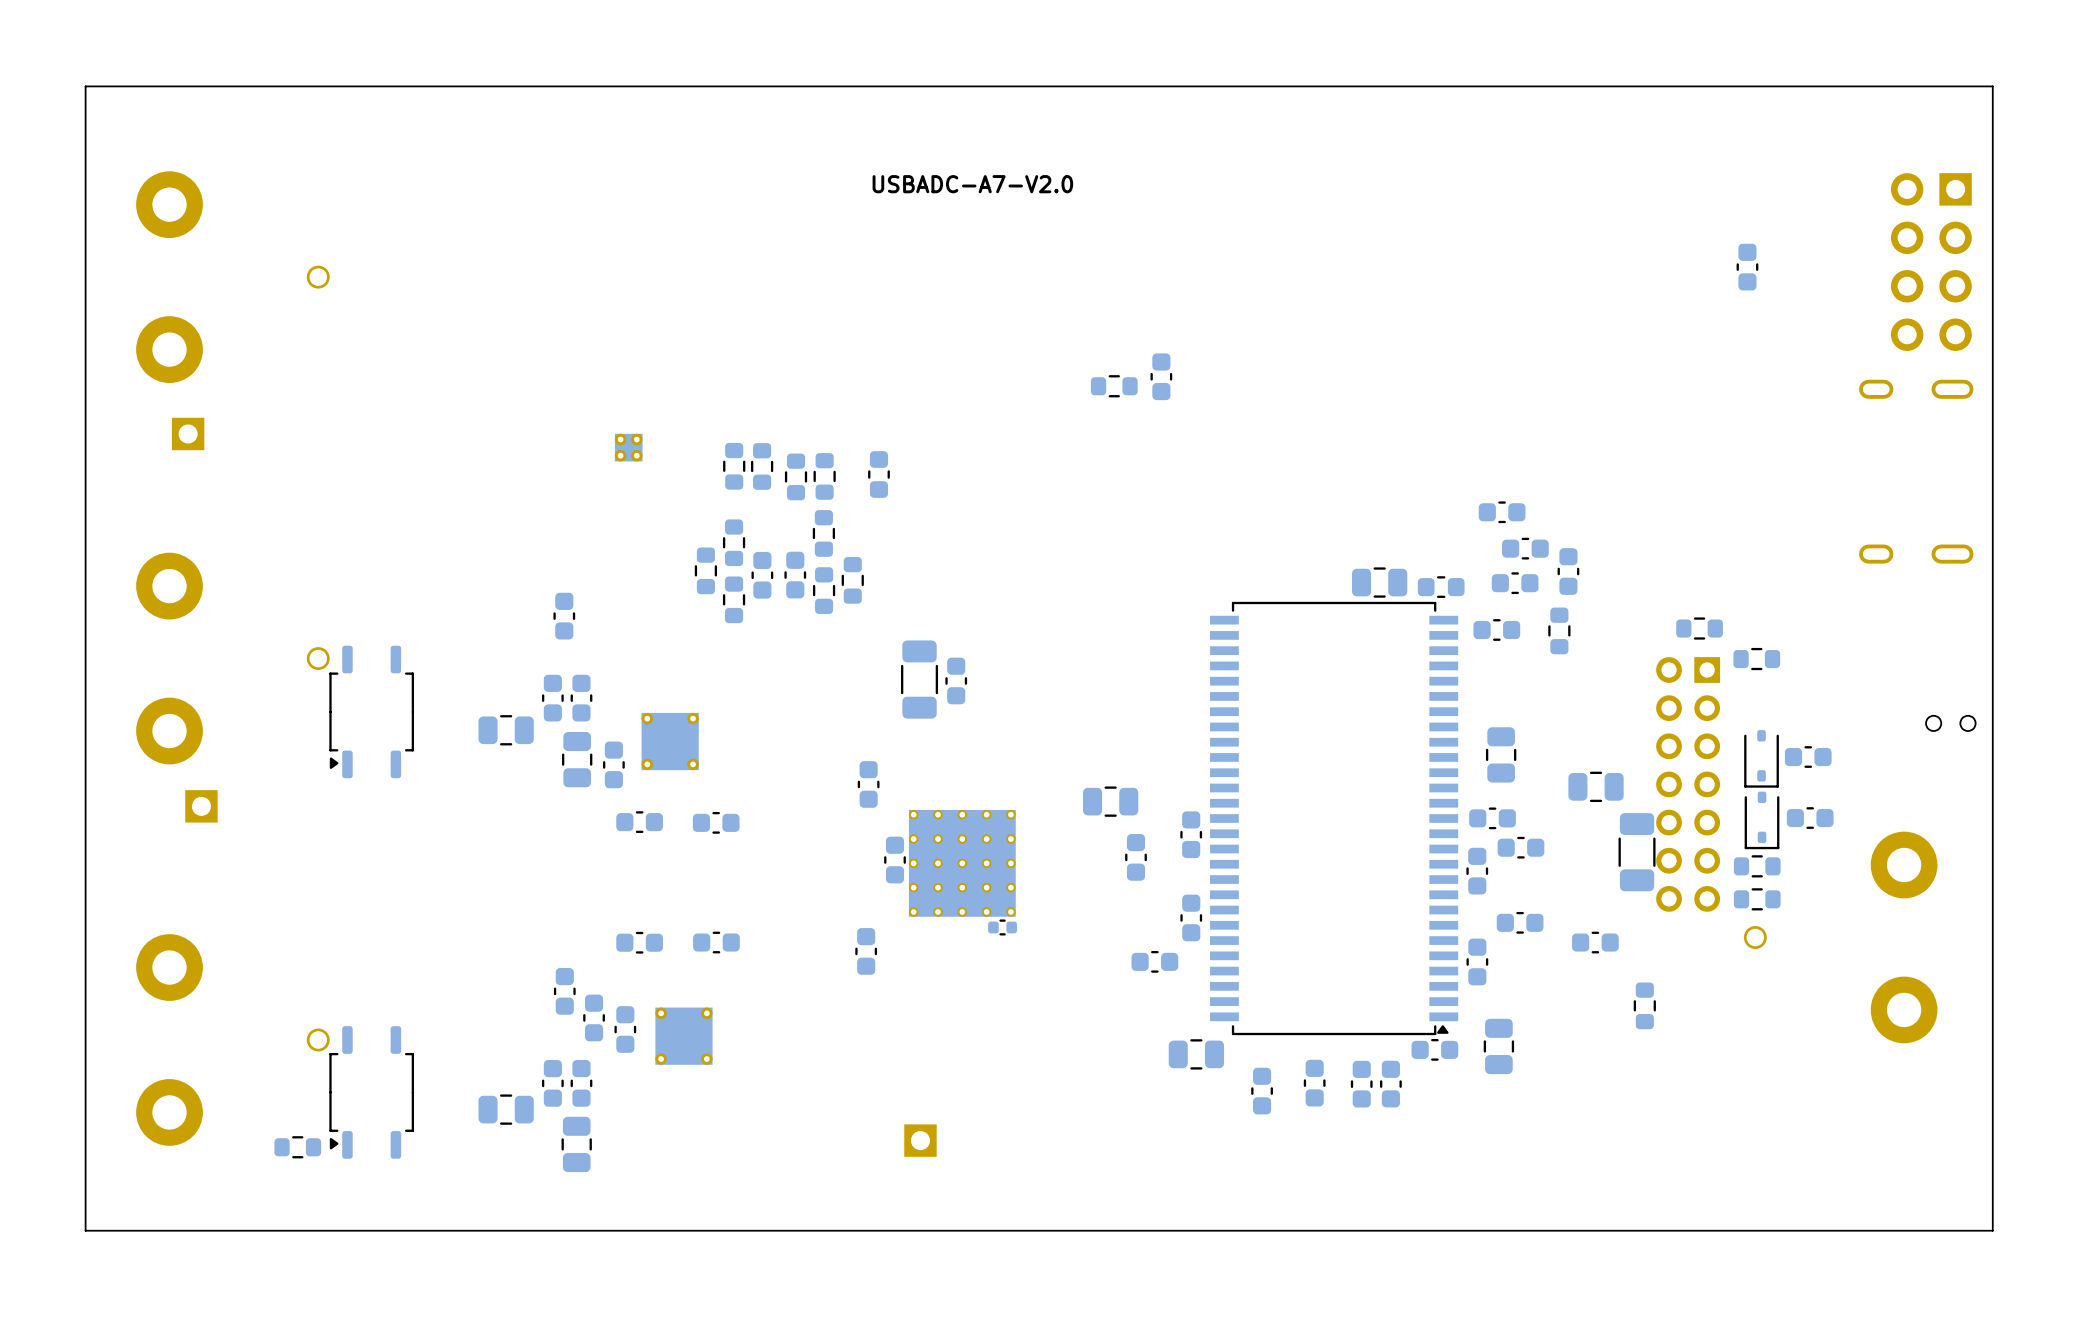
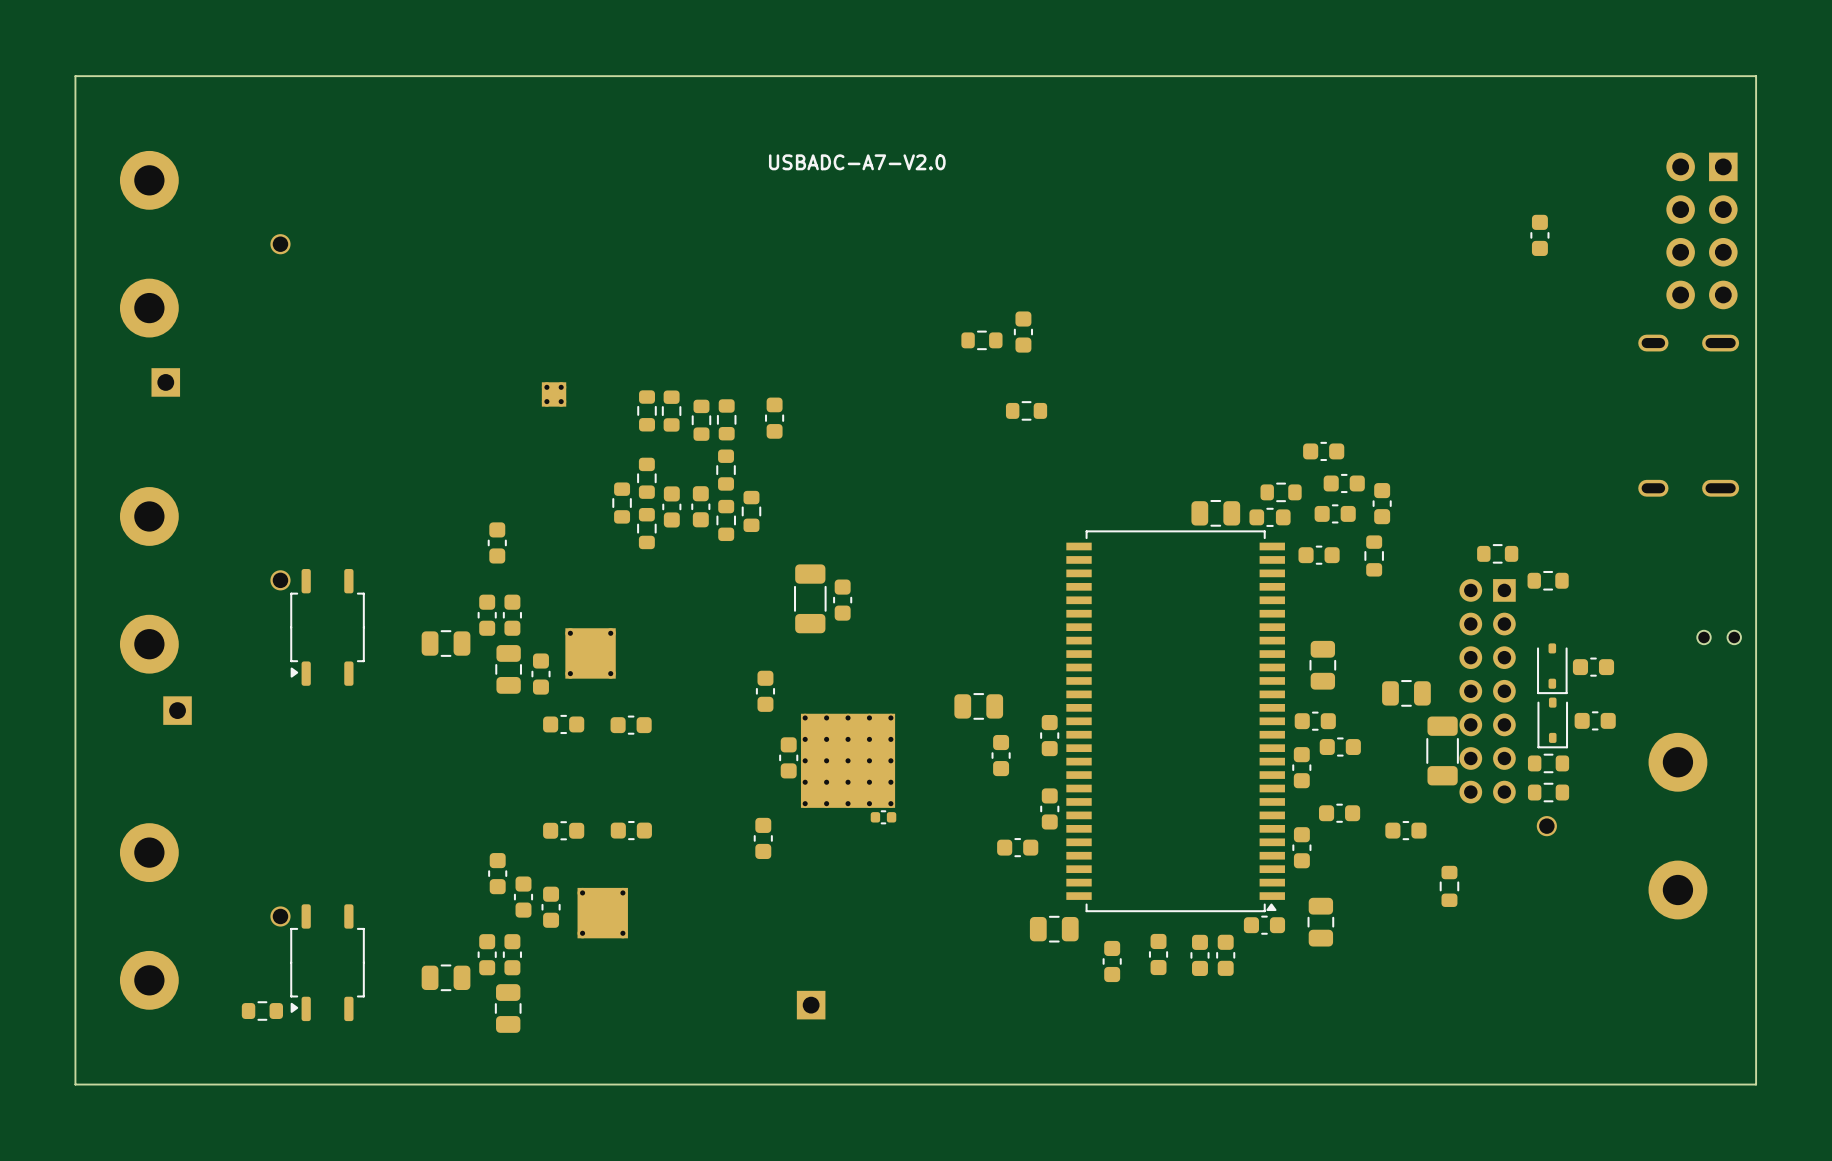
part: none -> (1026, 410)
part: none -> (1281, 492)

